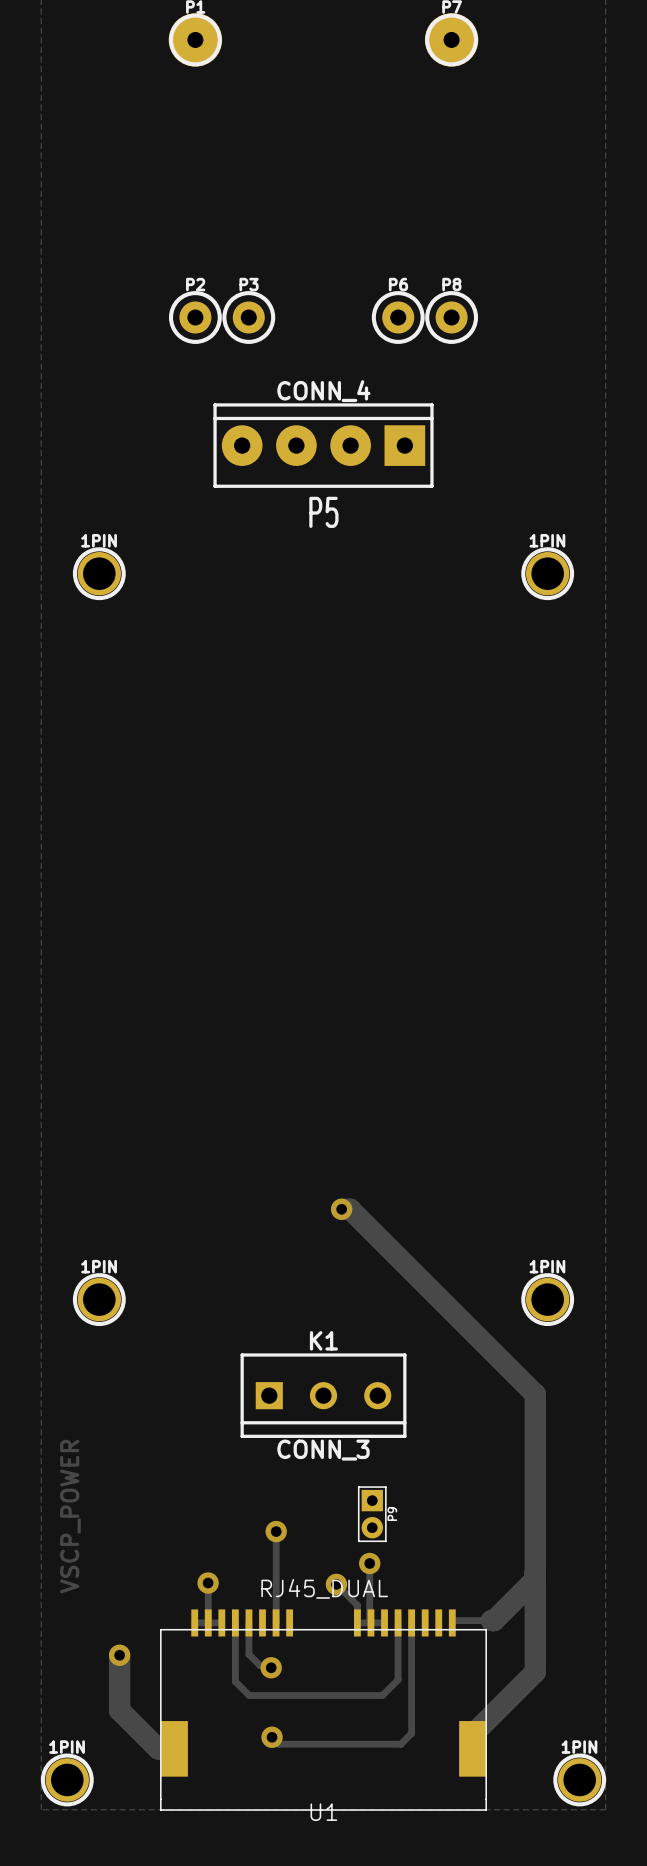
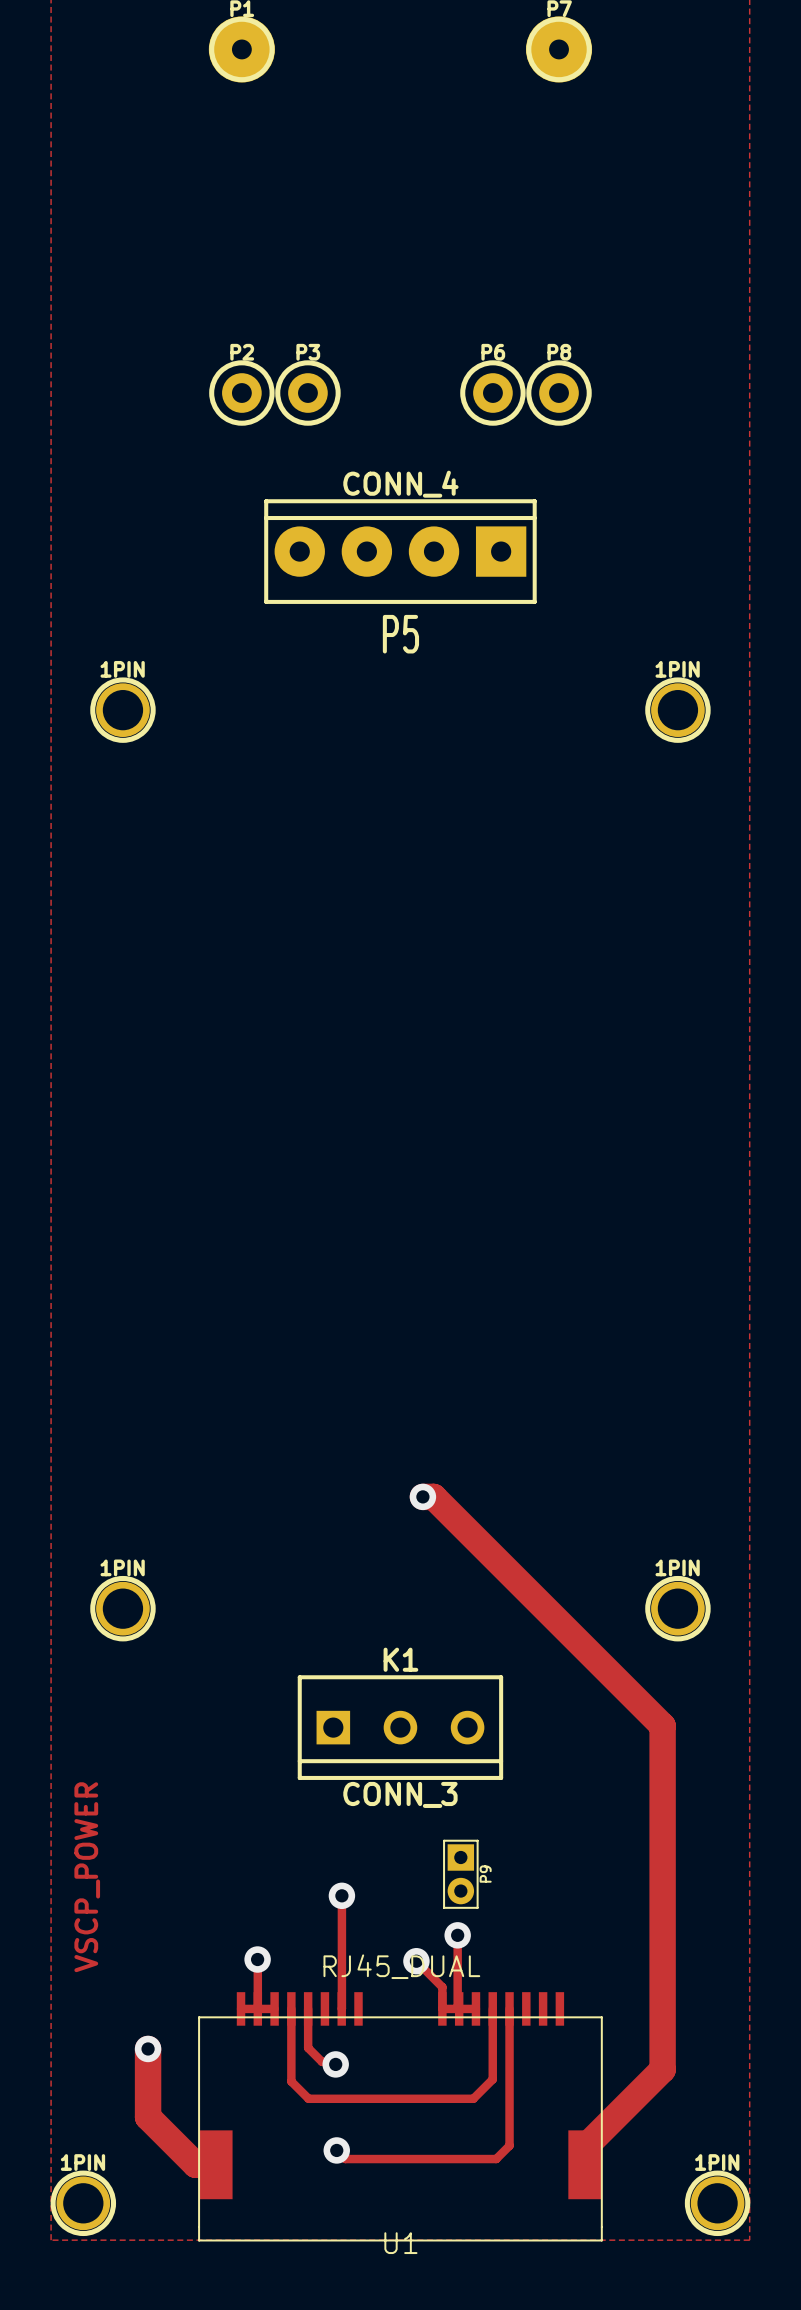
track: (535, 1579) (494, 1620) (491, 1620) -> none
track: (492, 1620) (454, 1620) (452, 1622) -> none

